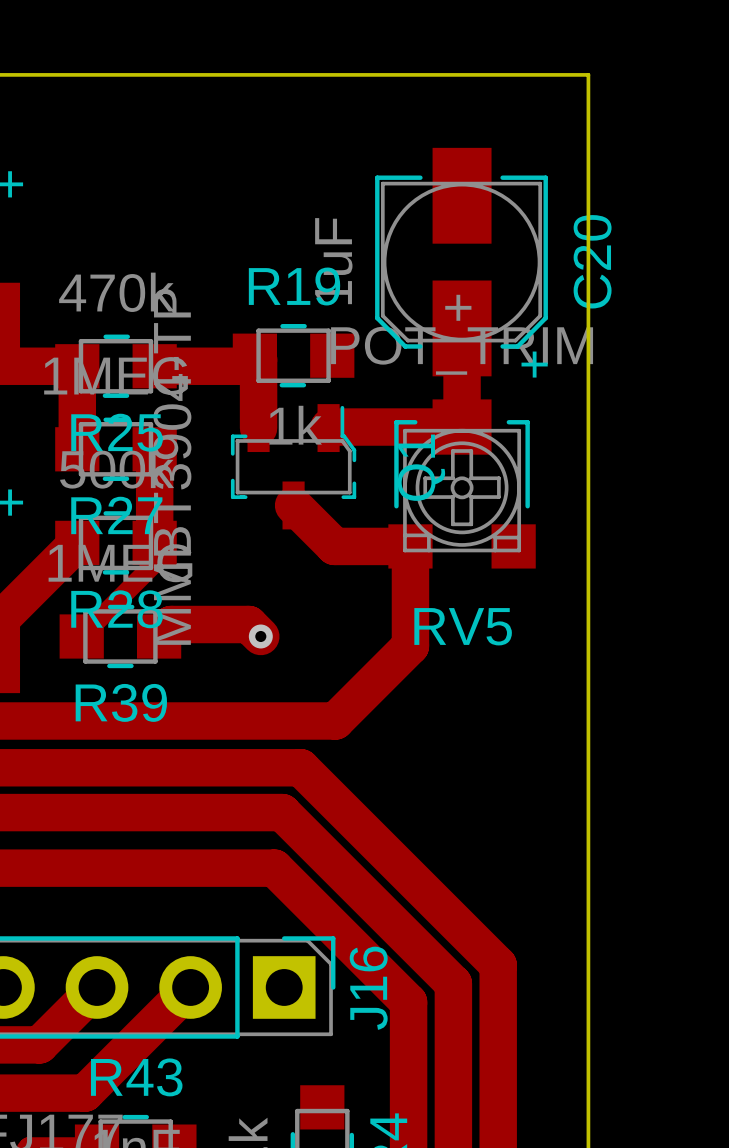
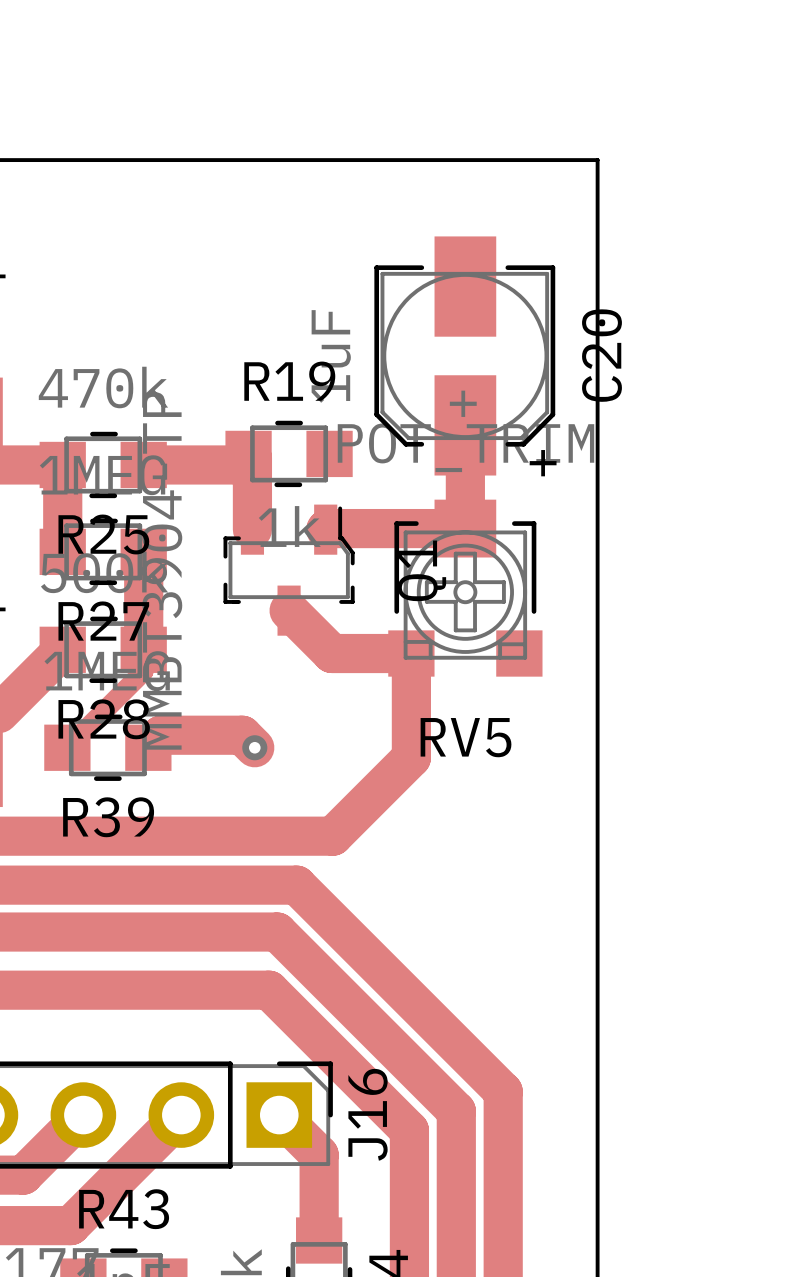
track: none -> (279, 1115) (319, 1154) (319, 1240)

